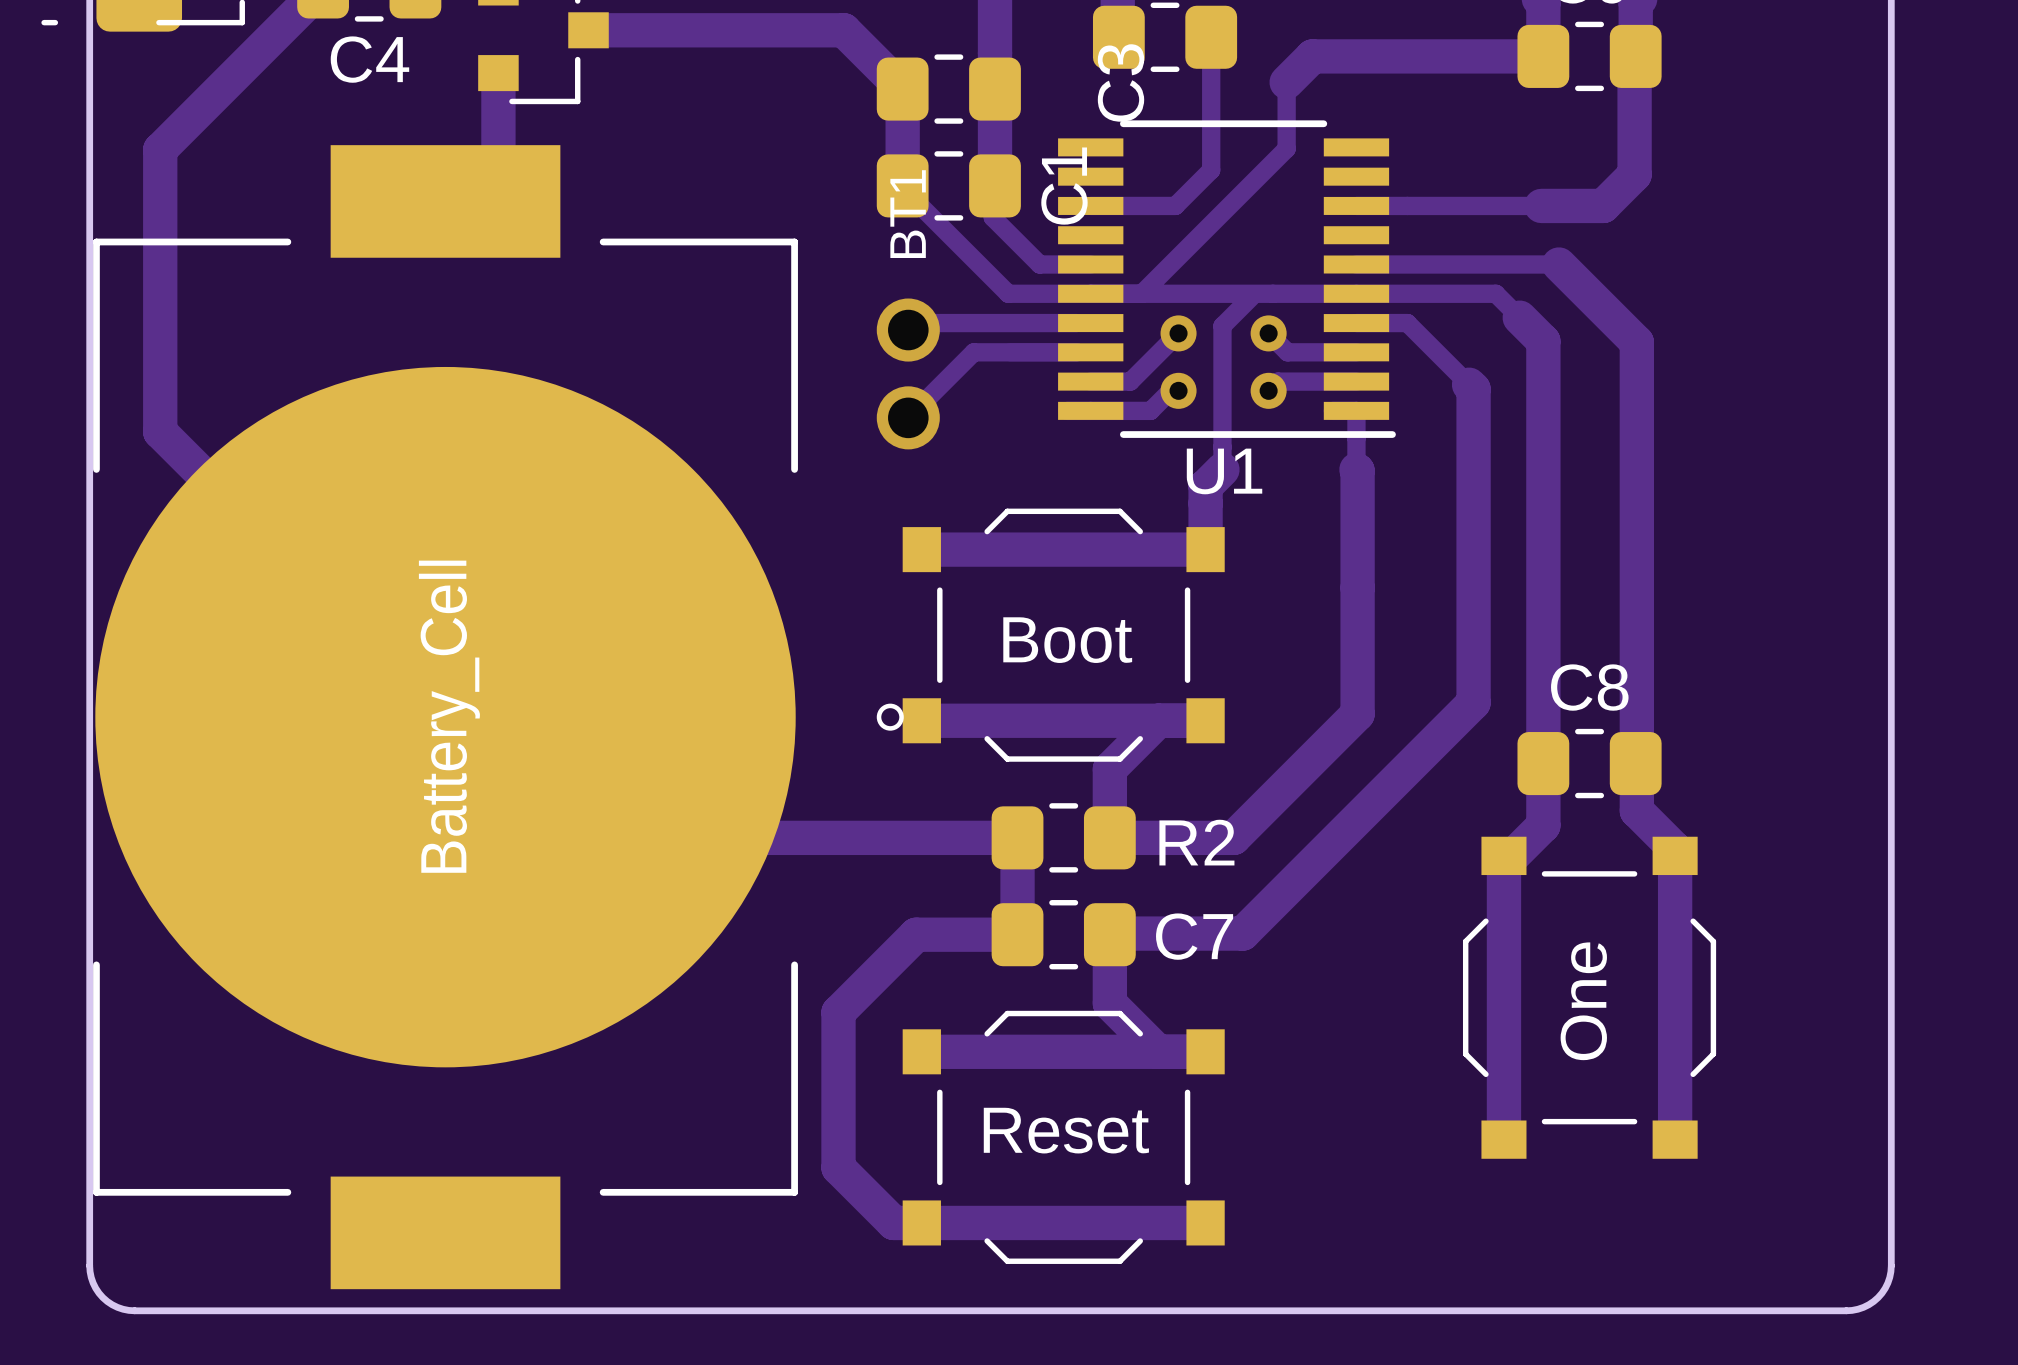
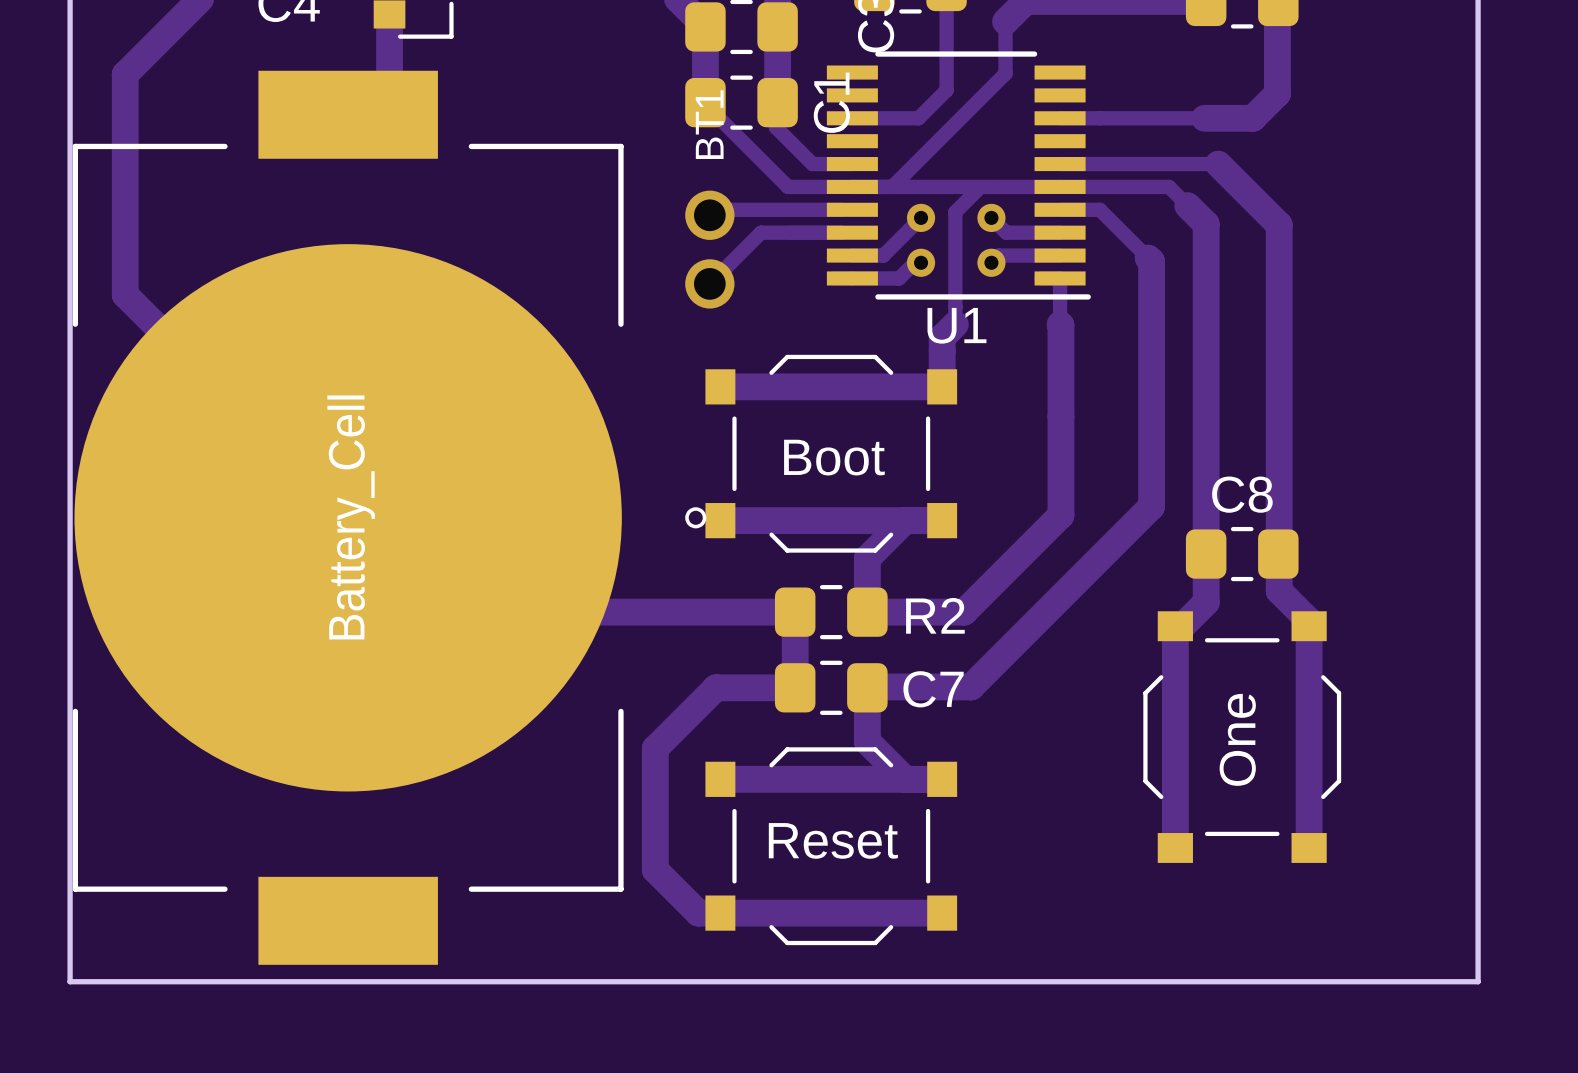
board edge: (89, 1265) (93, 1282) (102, 1297) (117, 1307) (134, 1310) -> (70, 946) (70, 981) (105, 981)
board edge: (1891, 1265) (1887, 1282) (1878, 1297) (1863, 1307) (1846, 1310) -> (1478, 946) (1478, 981) (1442, 981)

